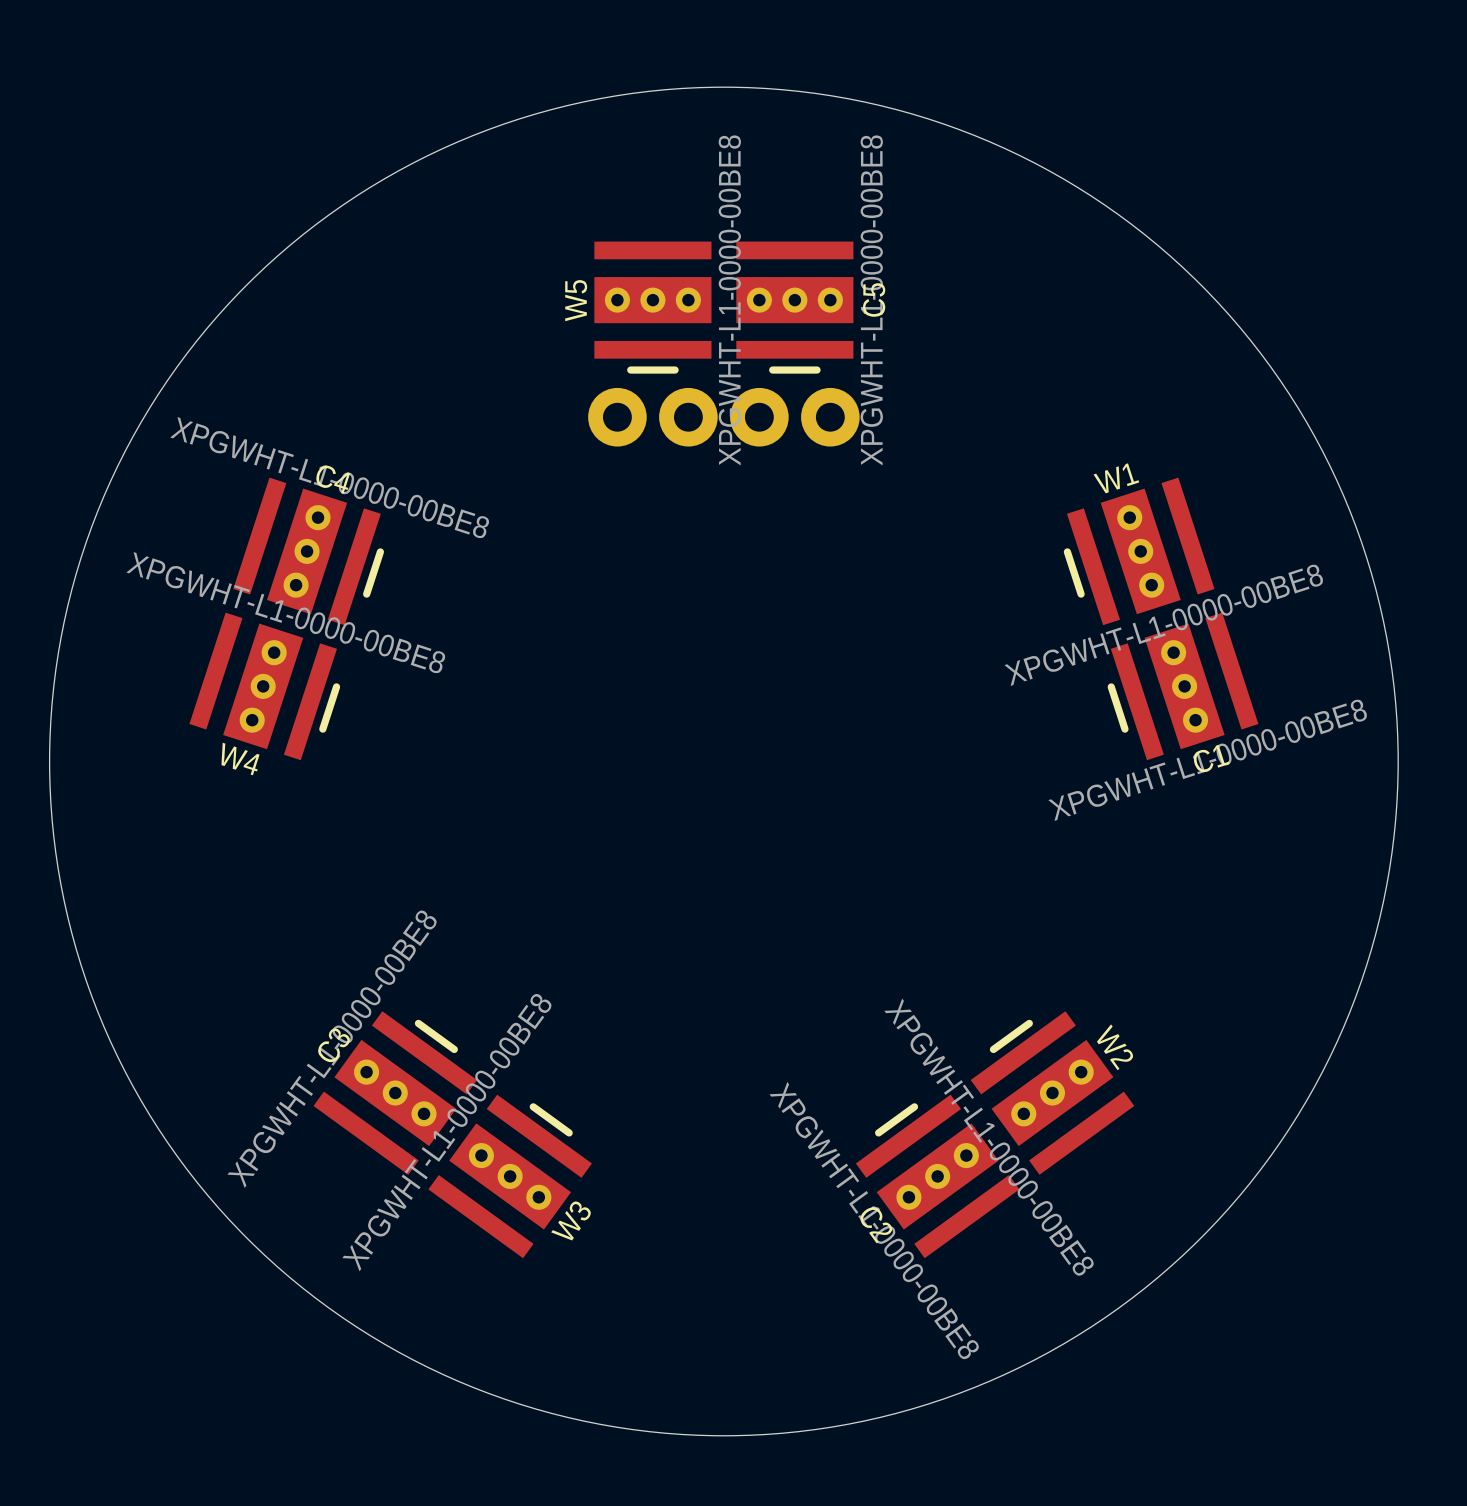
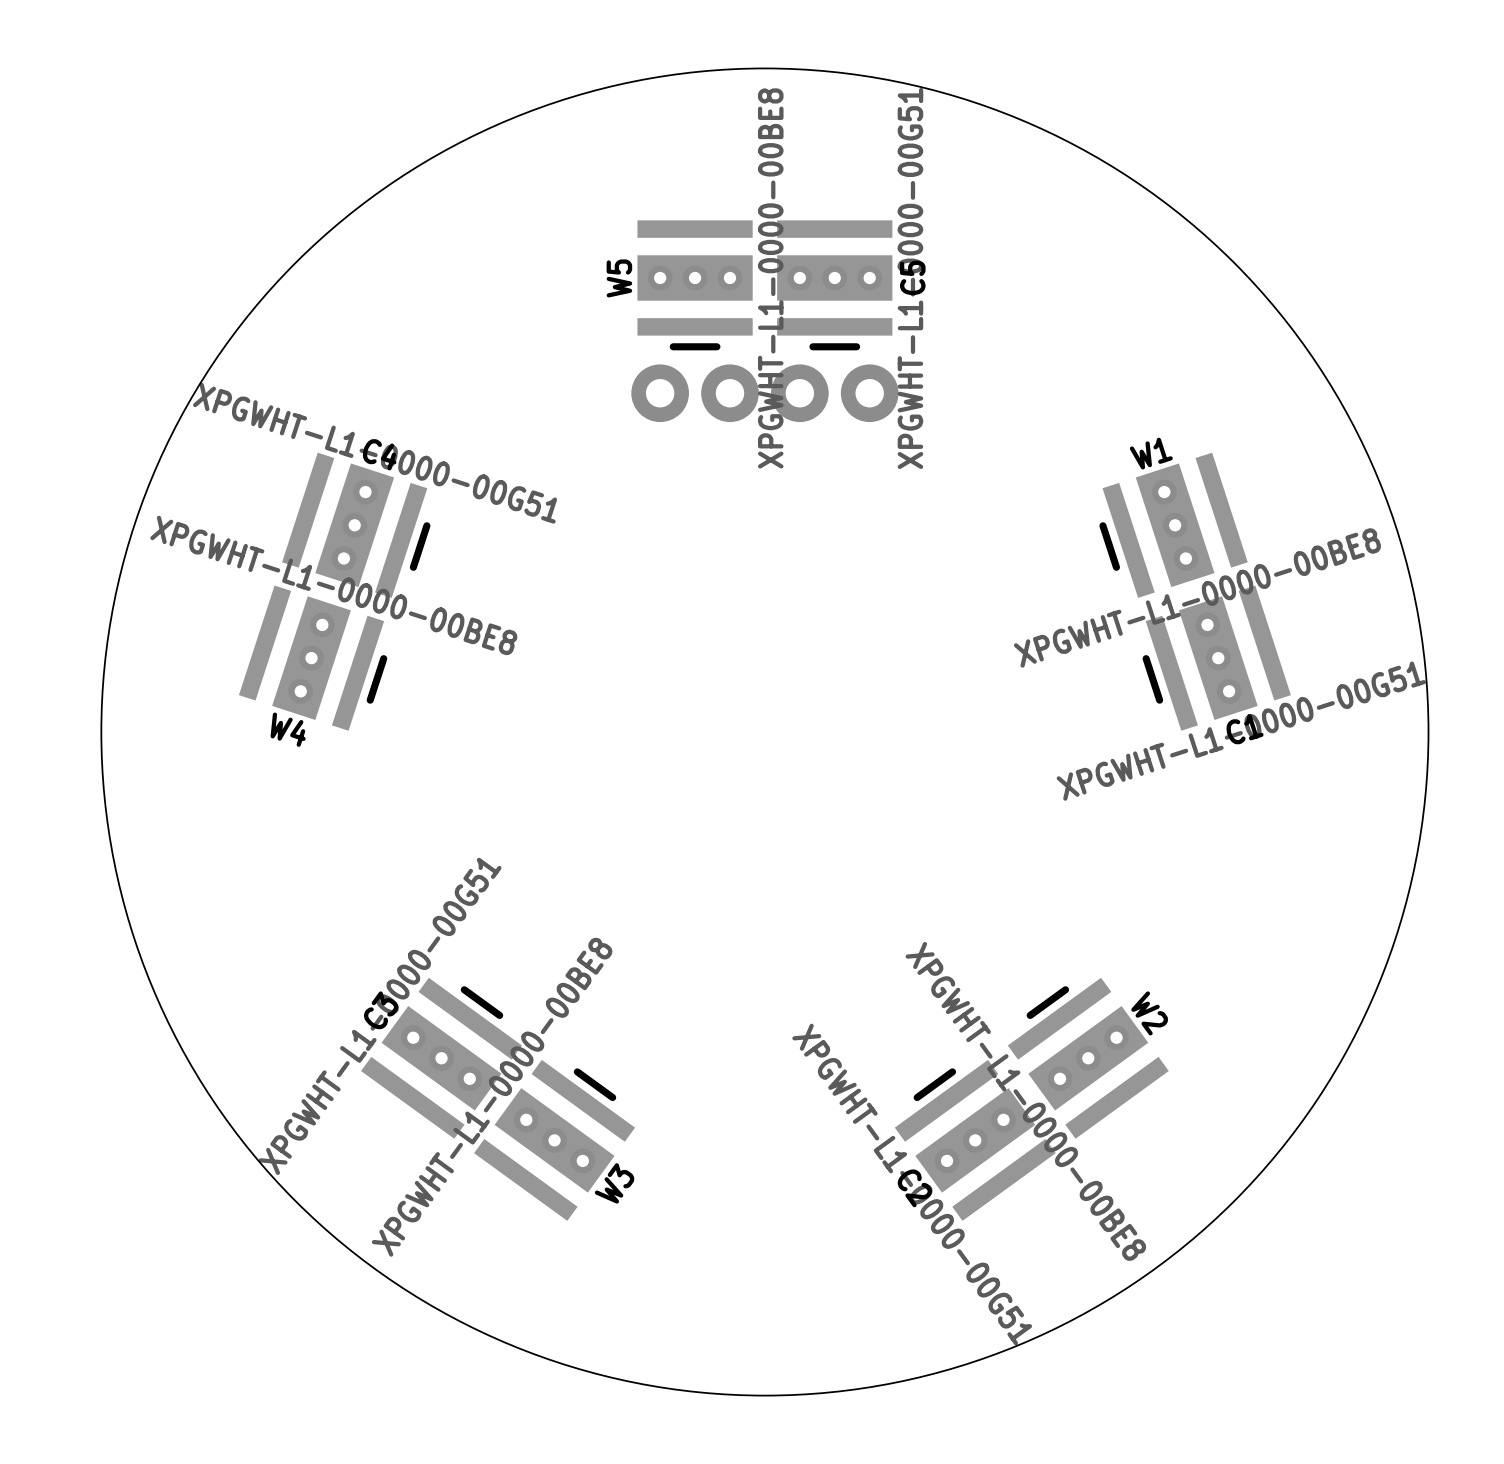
C5 value: XPGWHT-L1-0000-00BE8 (871, 300) -> XPGWHT-L1-0000-00G51 (910, 278)
C4 value: XPGWHT-L1-0000-00BE8 (329, 477) -> XPGWHT-L1-0000-00G51 (375, 453)
C1 value: XPGWHT-L1-0000-00BE8 (1207, 760) -> XPGWHT-L1-0000-00G51 (1241, 731)
C3 value: XPGWHT-L1-0000-00BE8 (332, 1049) -> XPGWHT-L1-0000-00G51 (380, 1016)
C2 value: XPGWHT-L1-0000-00BE8 (874, 1220) -> XPGWHT-L1-0000-00G51 (912, 1184)

